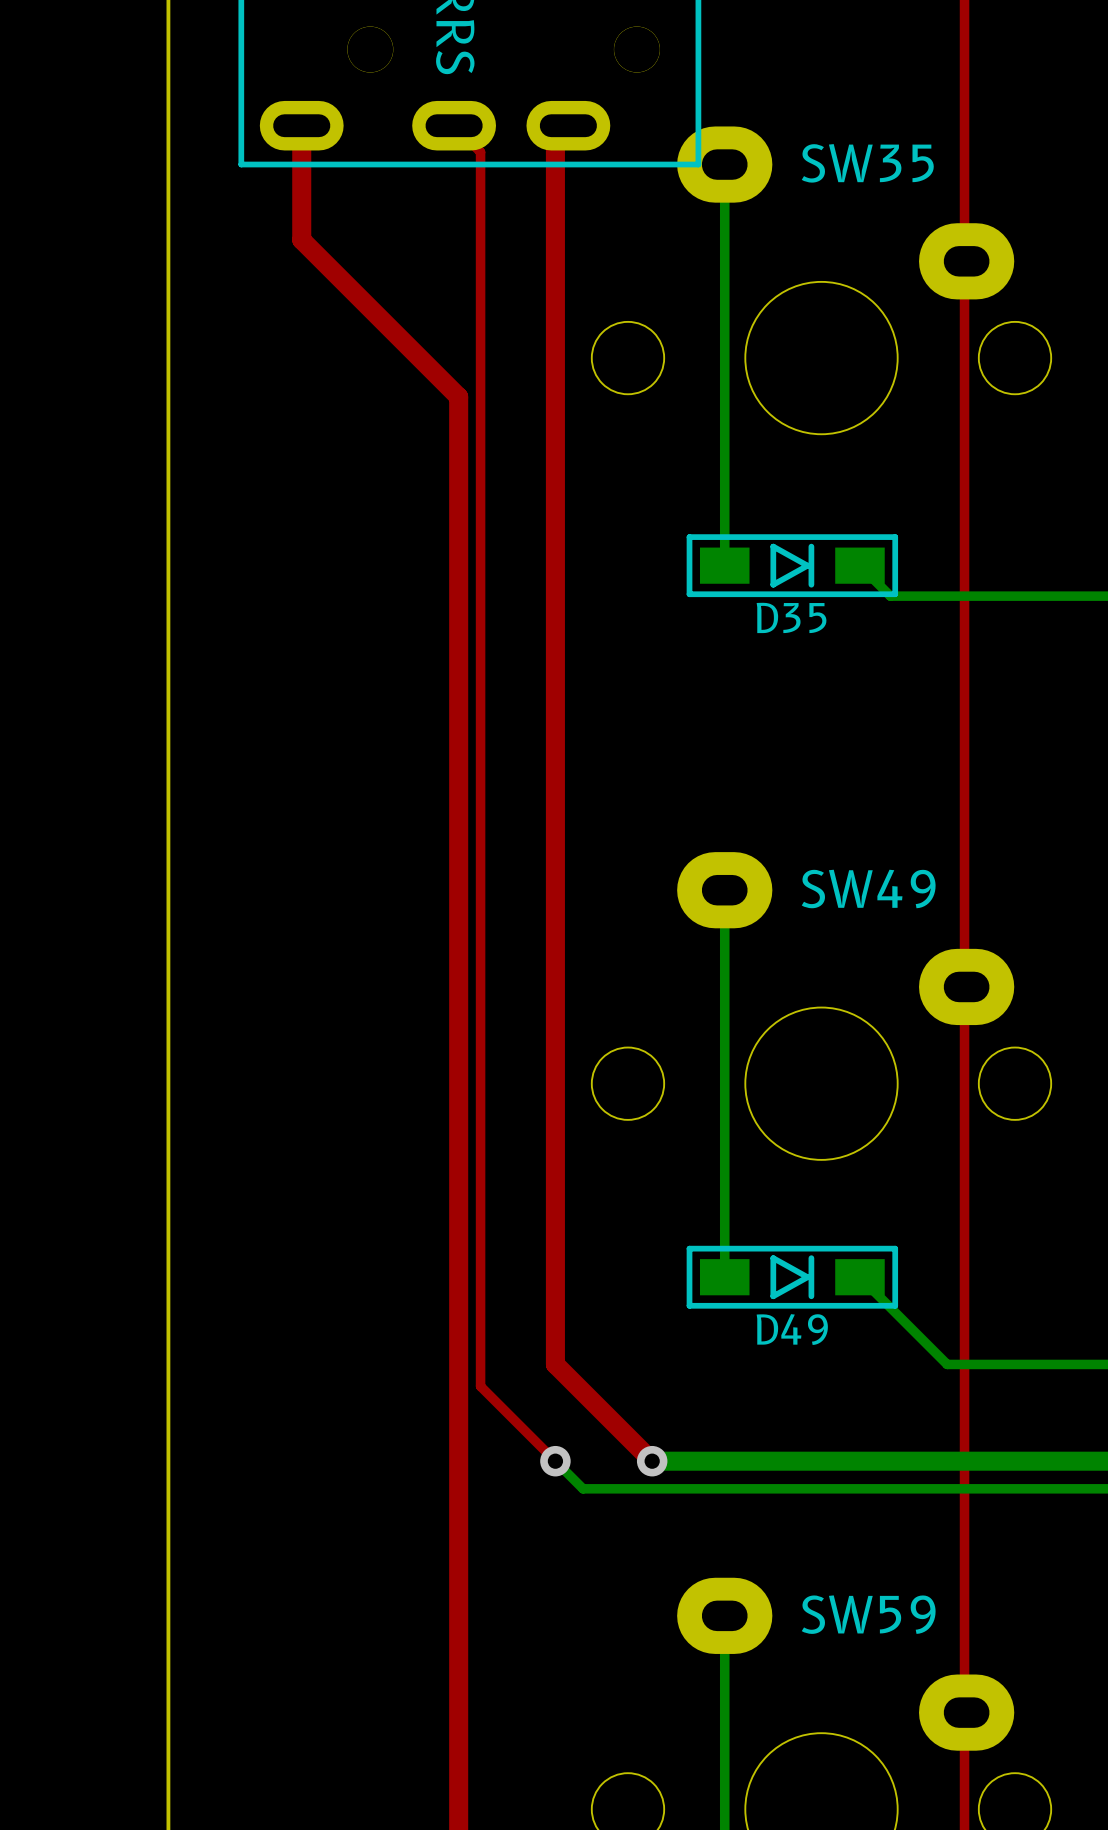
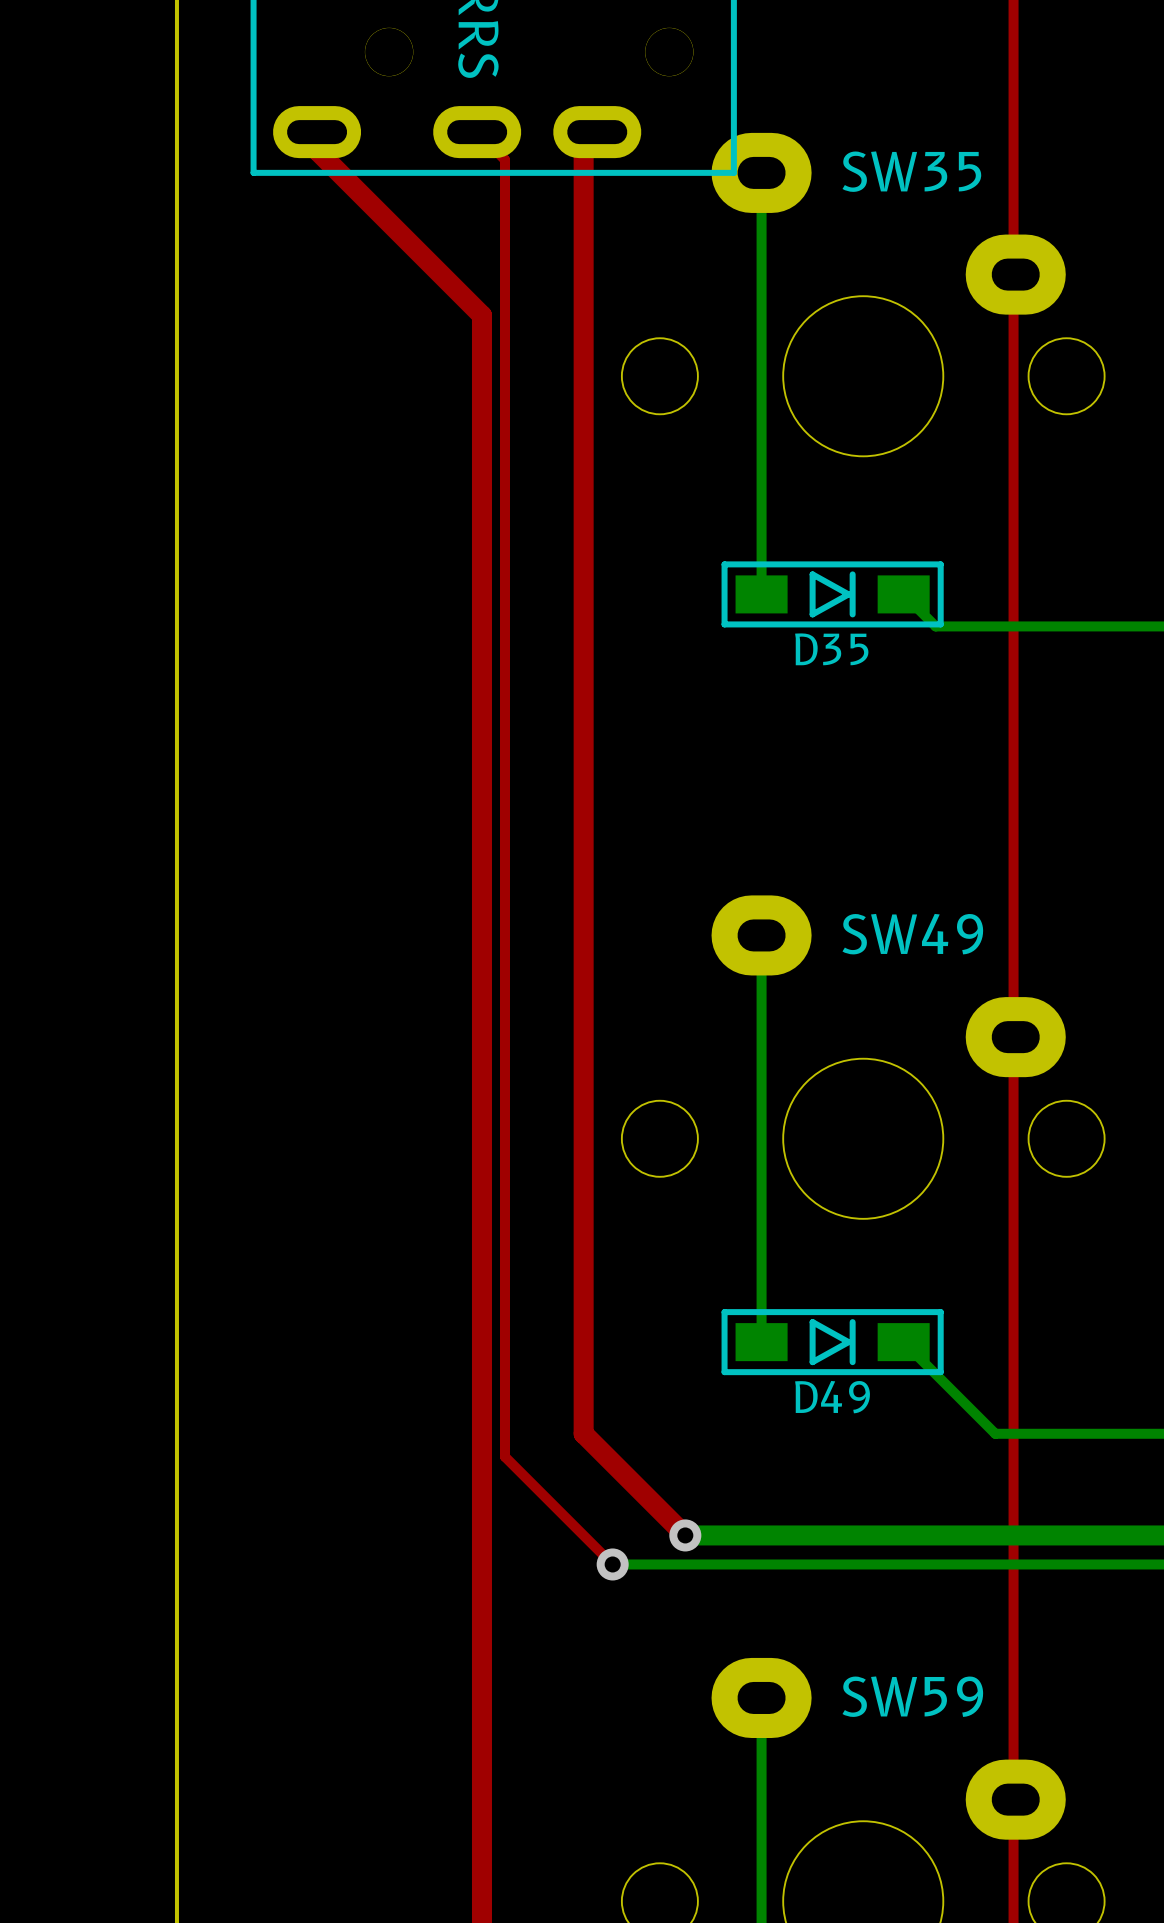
top track: (301, 143) (301, 239) (458, 396) -> (317, 150) (481, 315) (481, 417)
bottom track: (555, 1461) (583, 1488) -> none
top track: none -> (583, 1535) (612, 1564)
via position: (555, 1461) -> (612, 1564)

